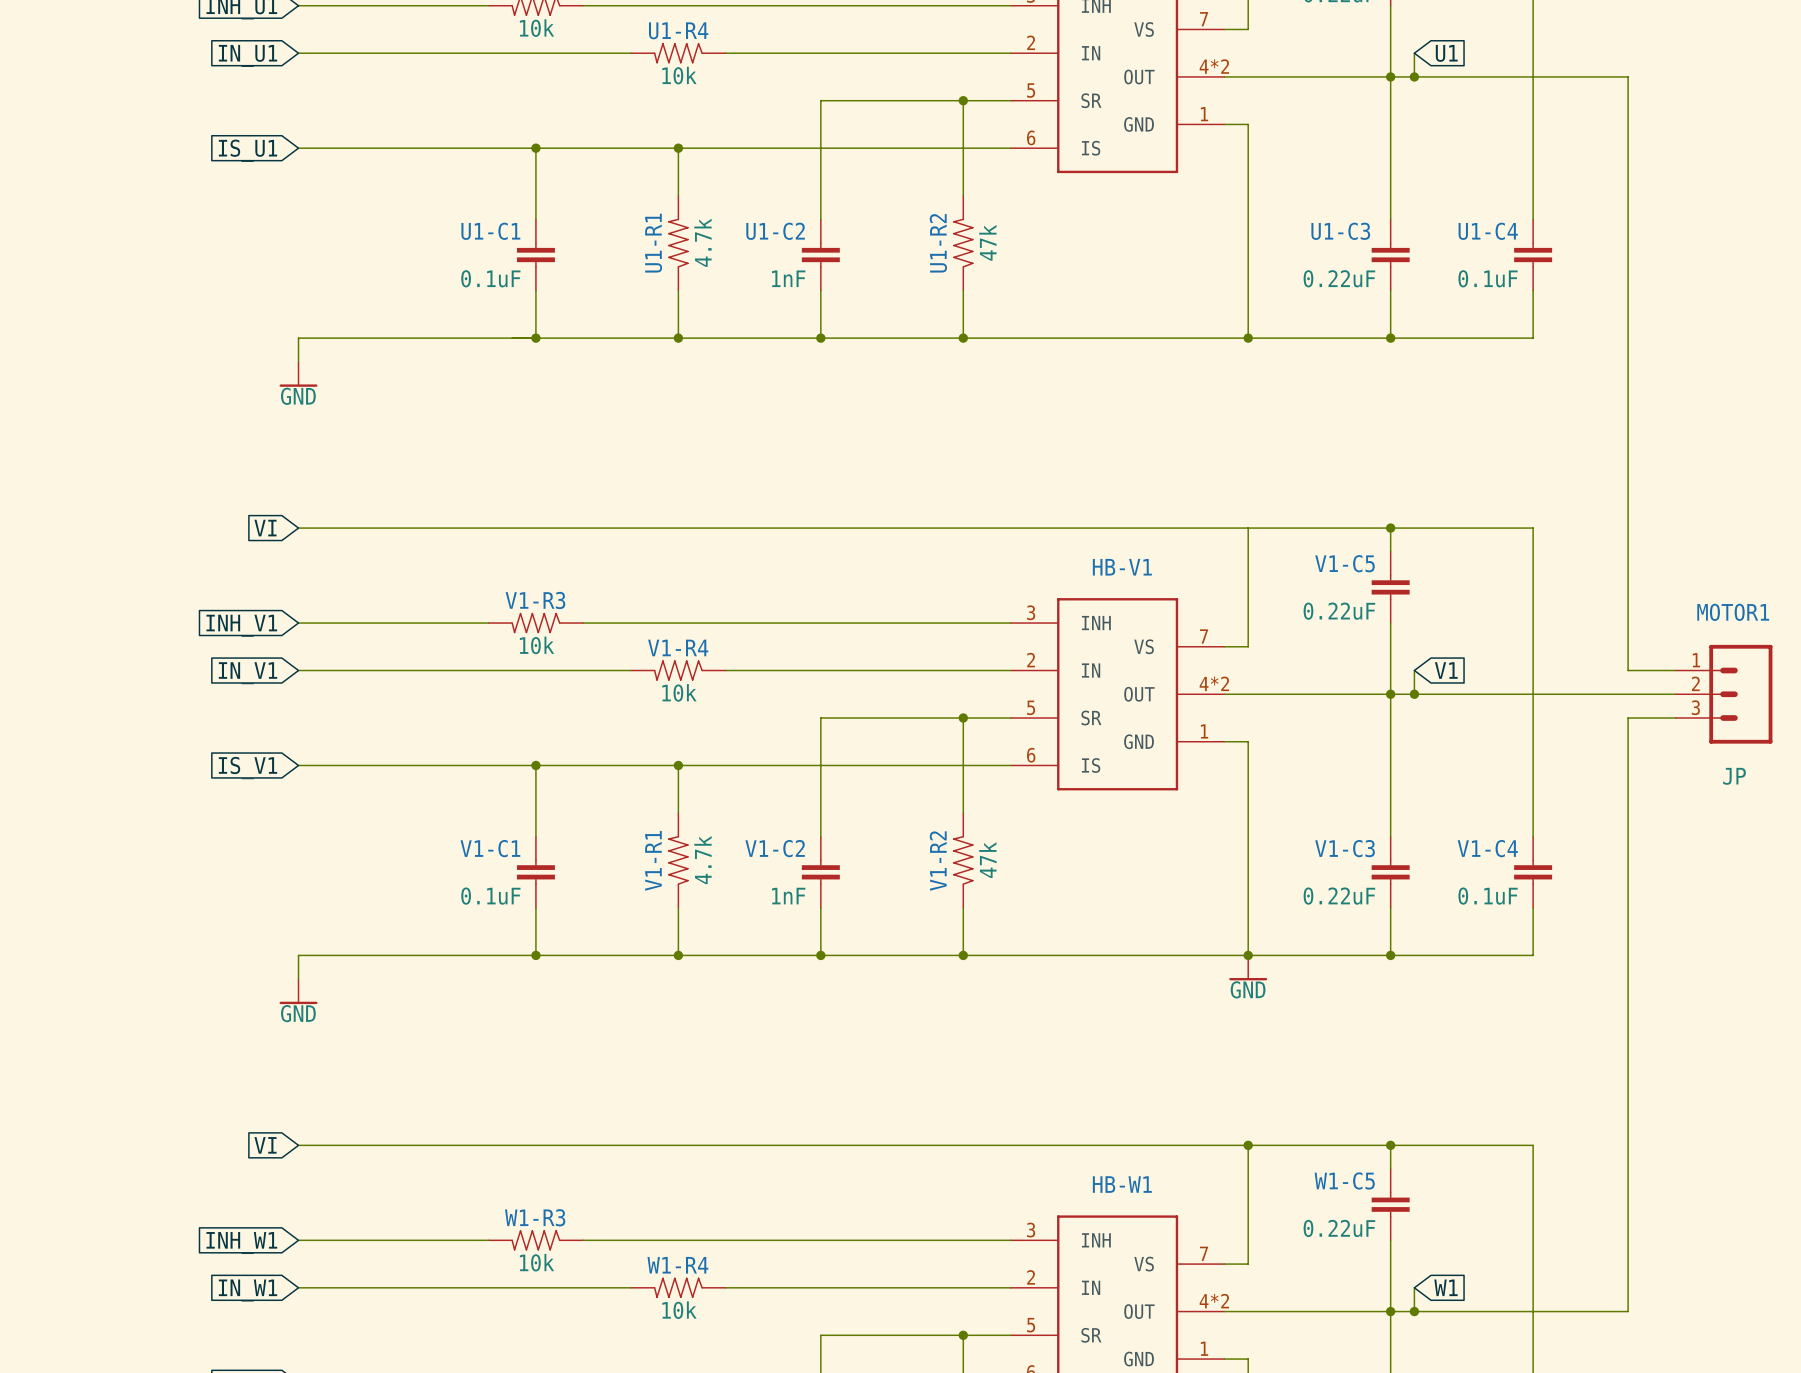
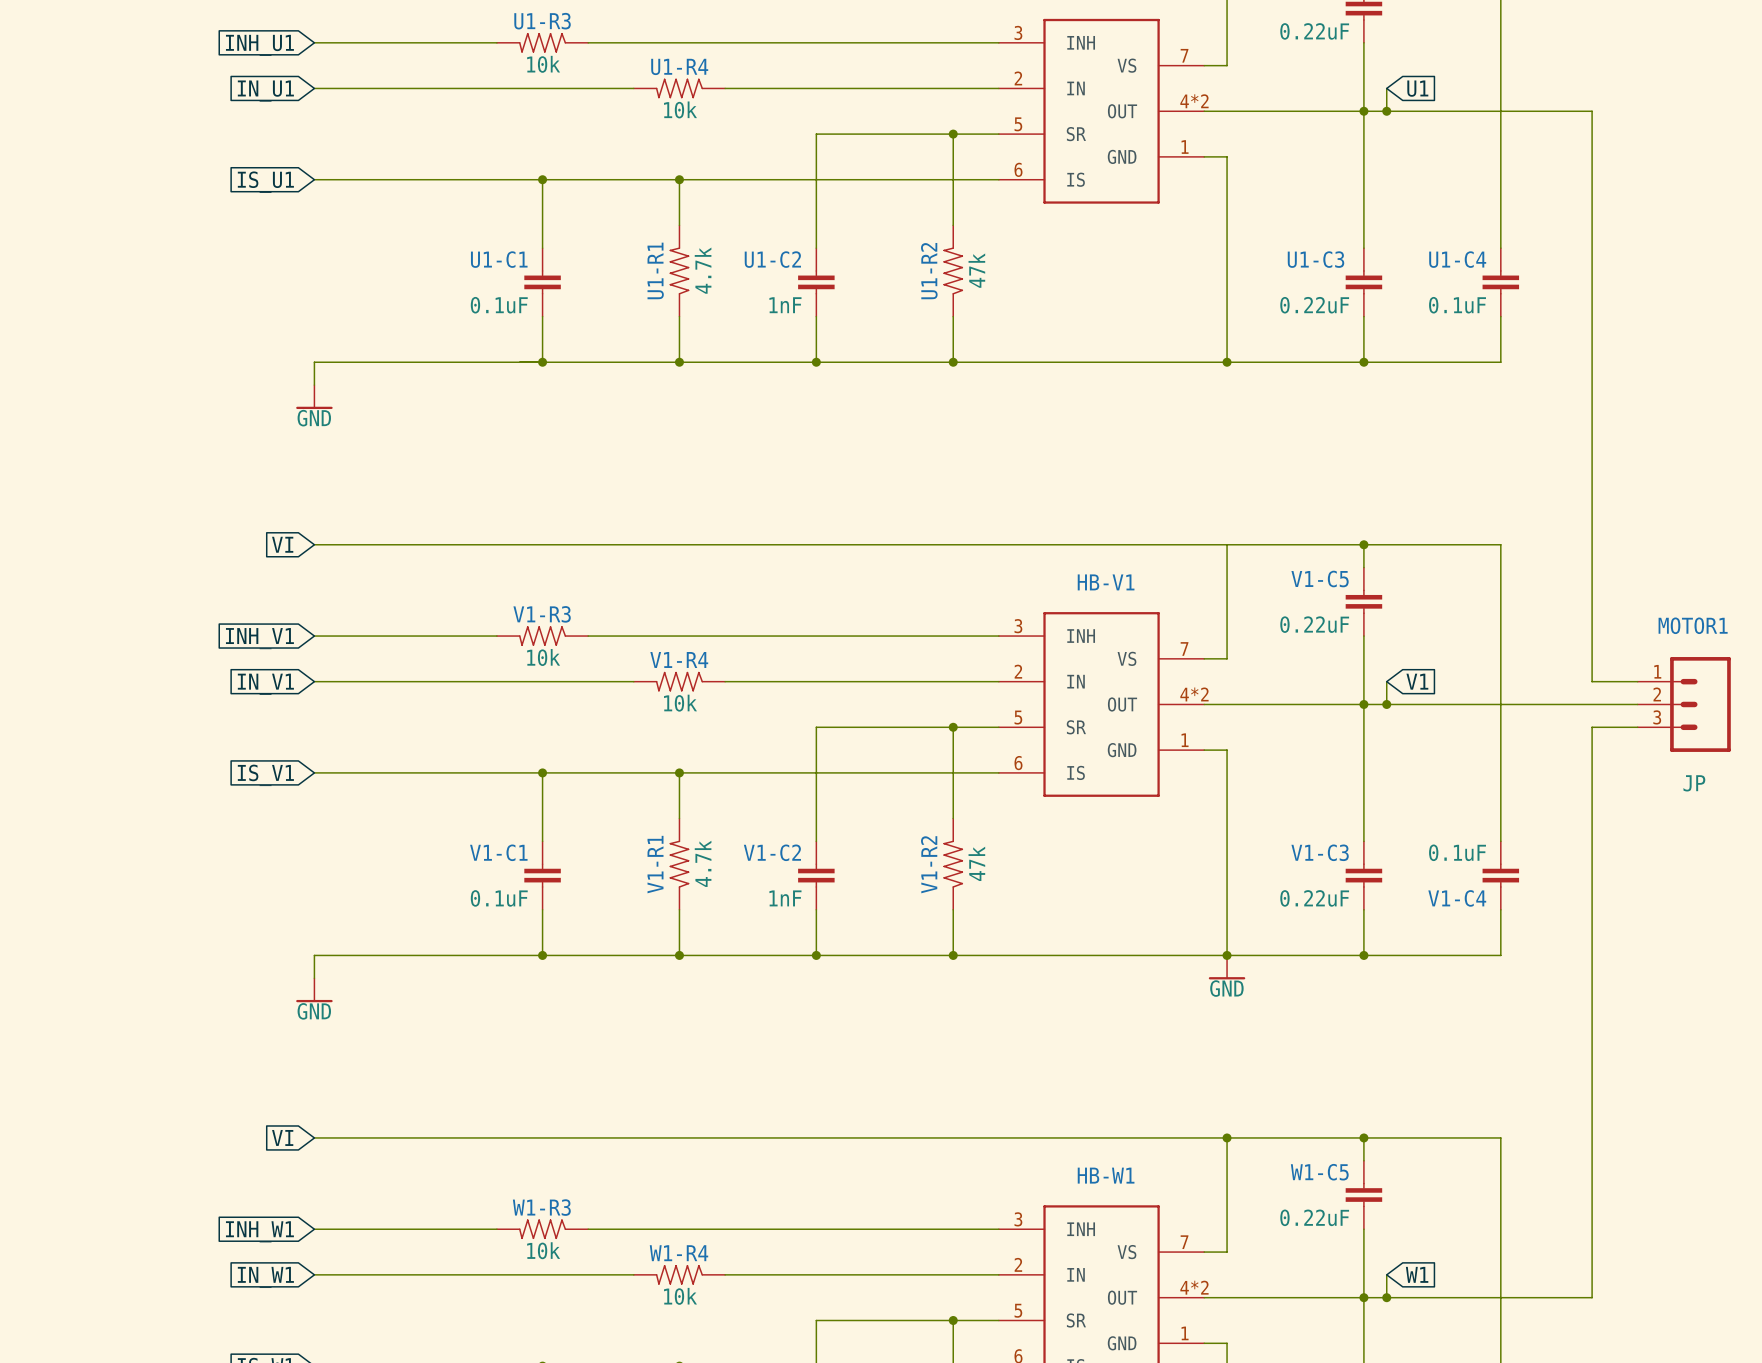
V1-C4 name position: V1-C4 (1487, 848) -> V1-C4 (1457, 898)
V1-C4 value position: 0.1uF (1488, 896) -> 0.1uF (1457, 852)

